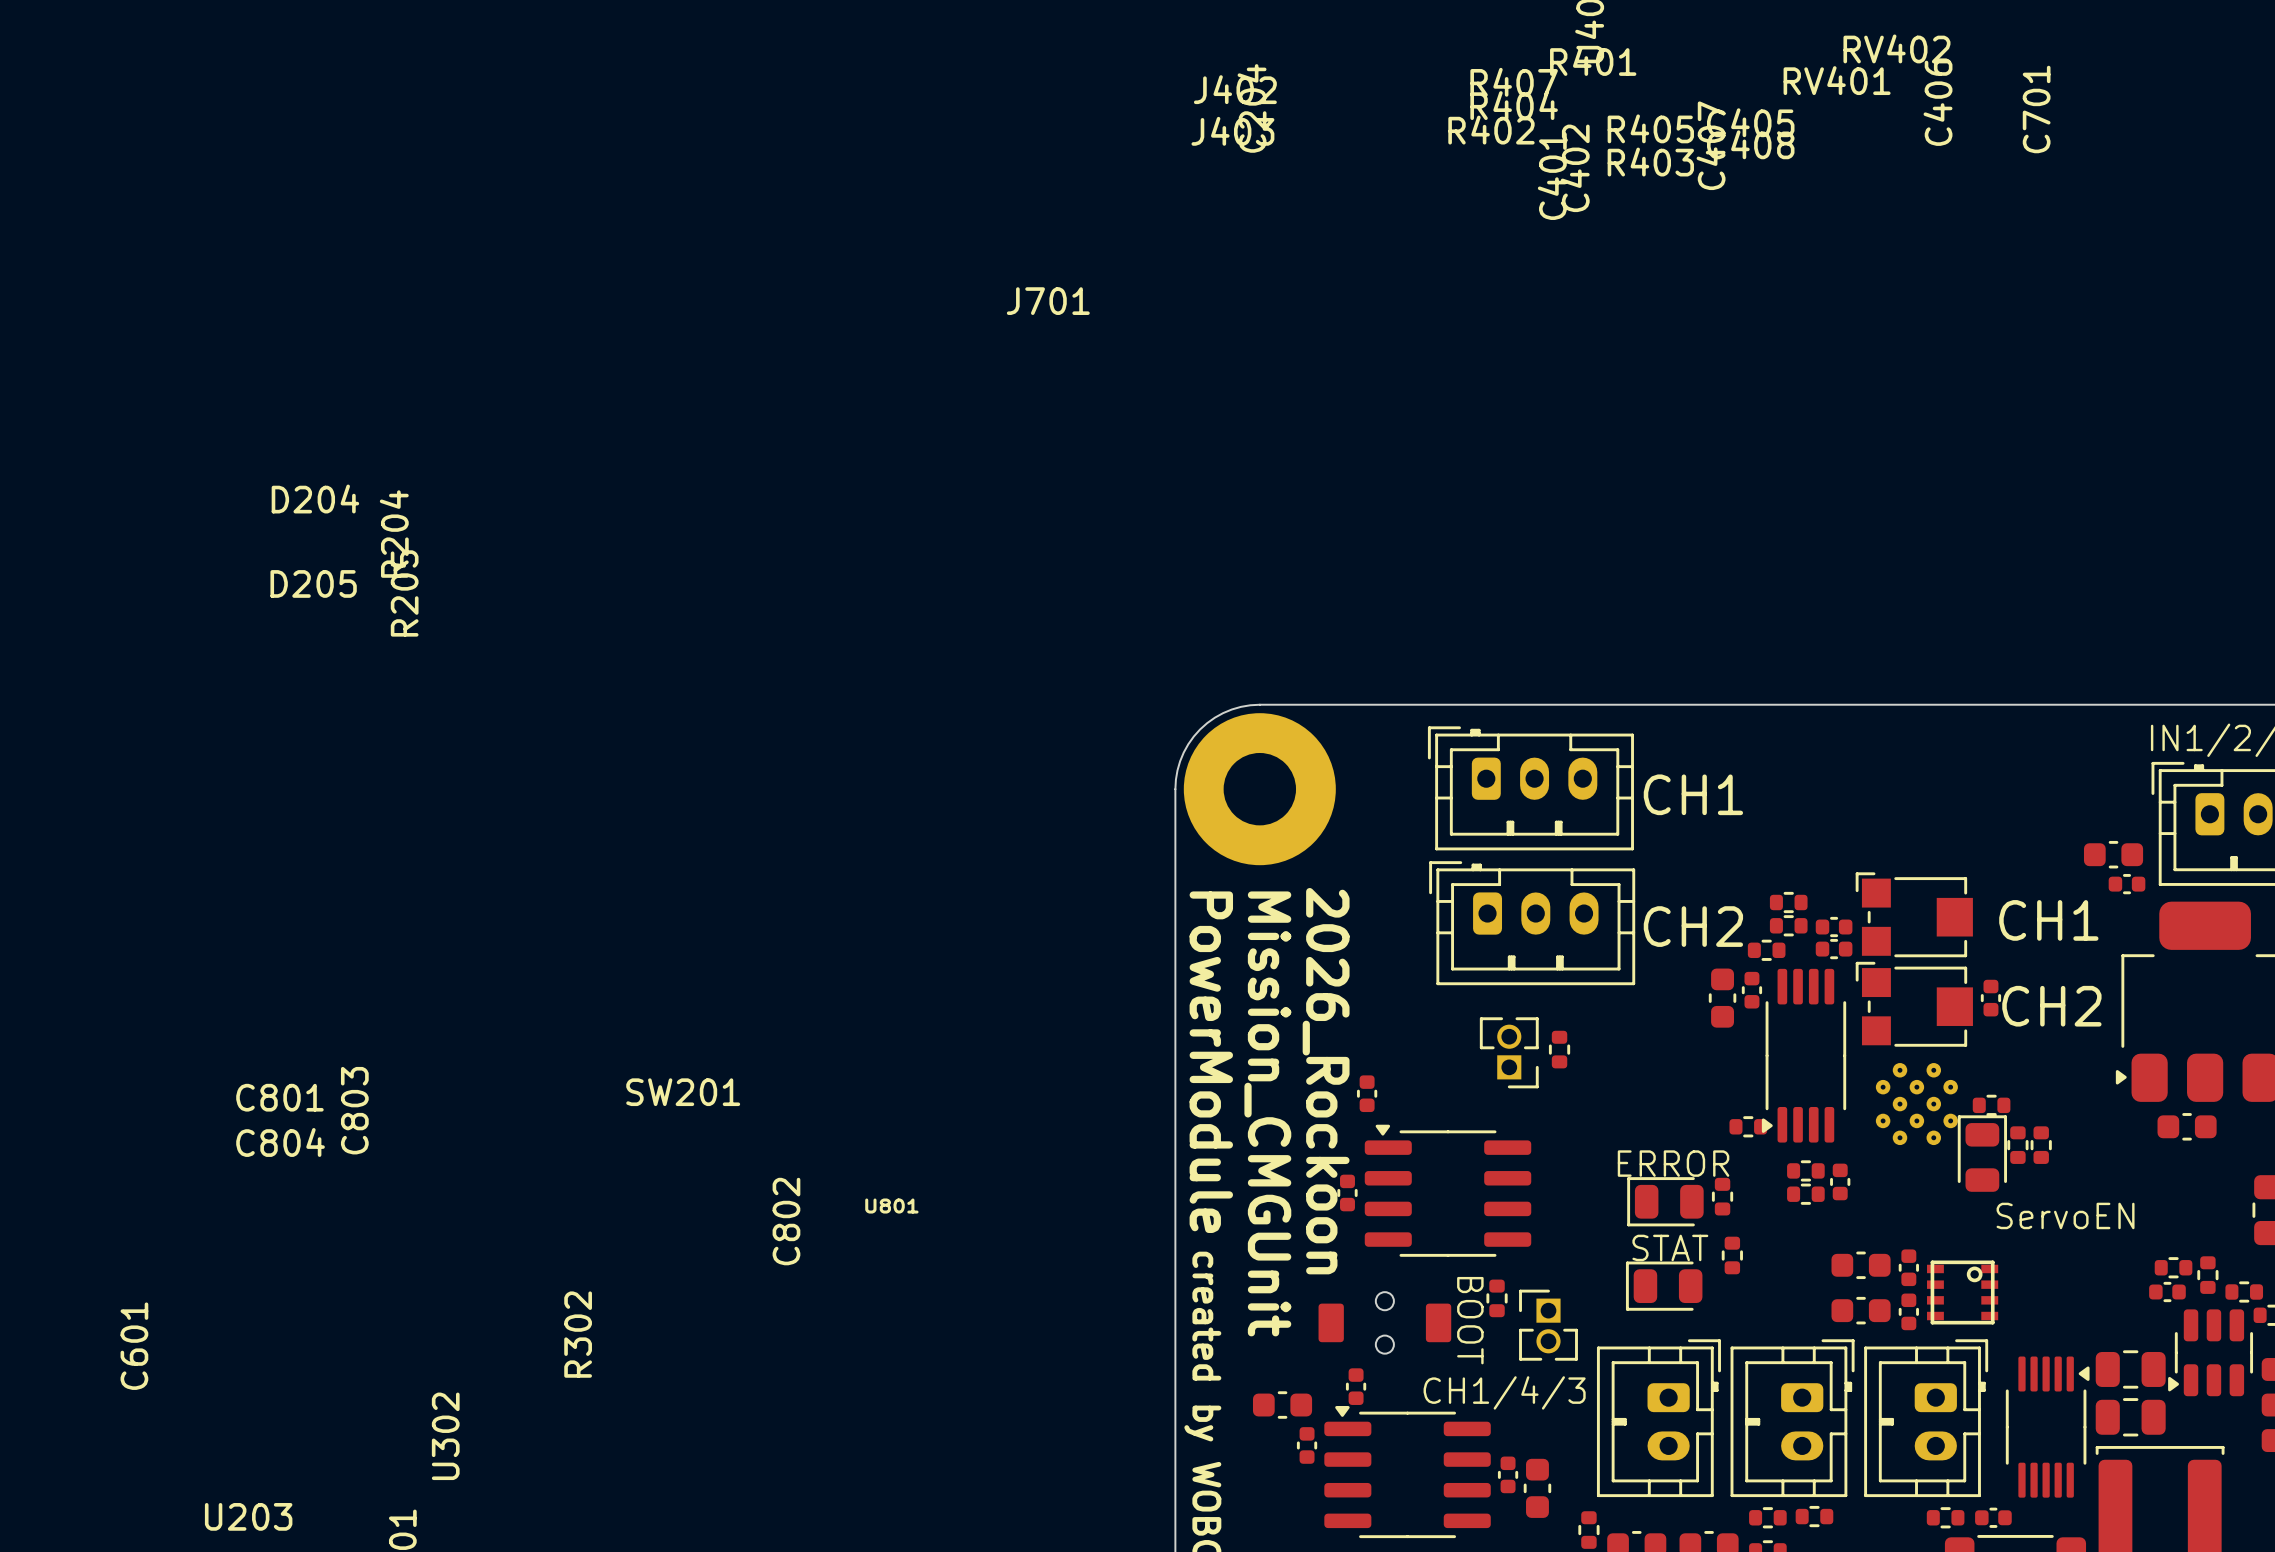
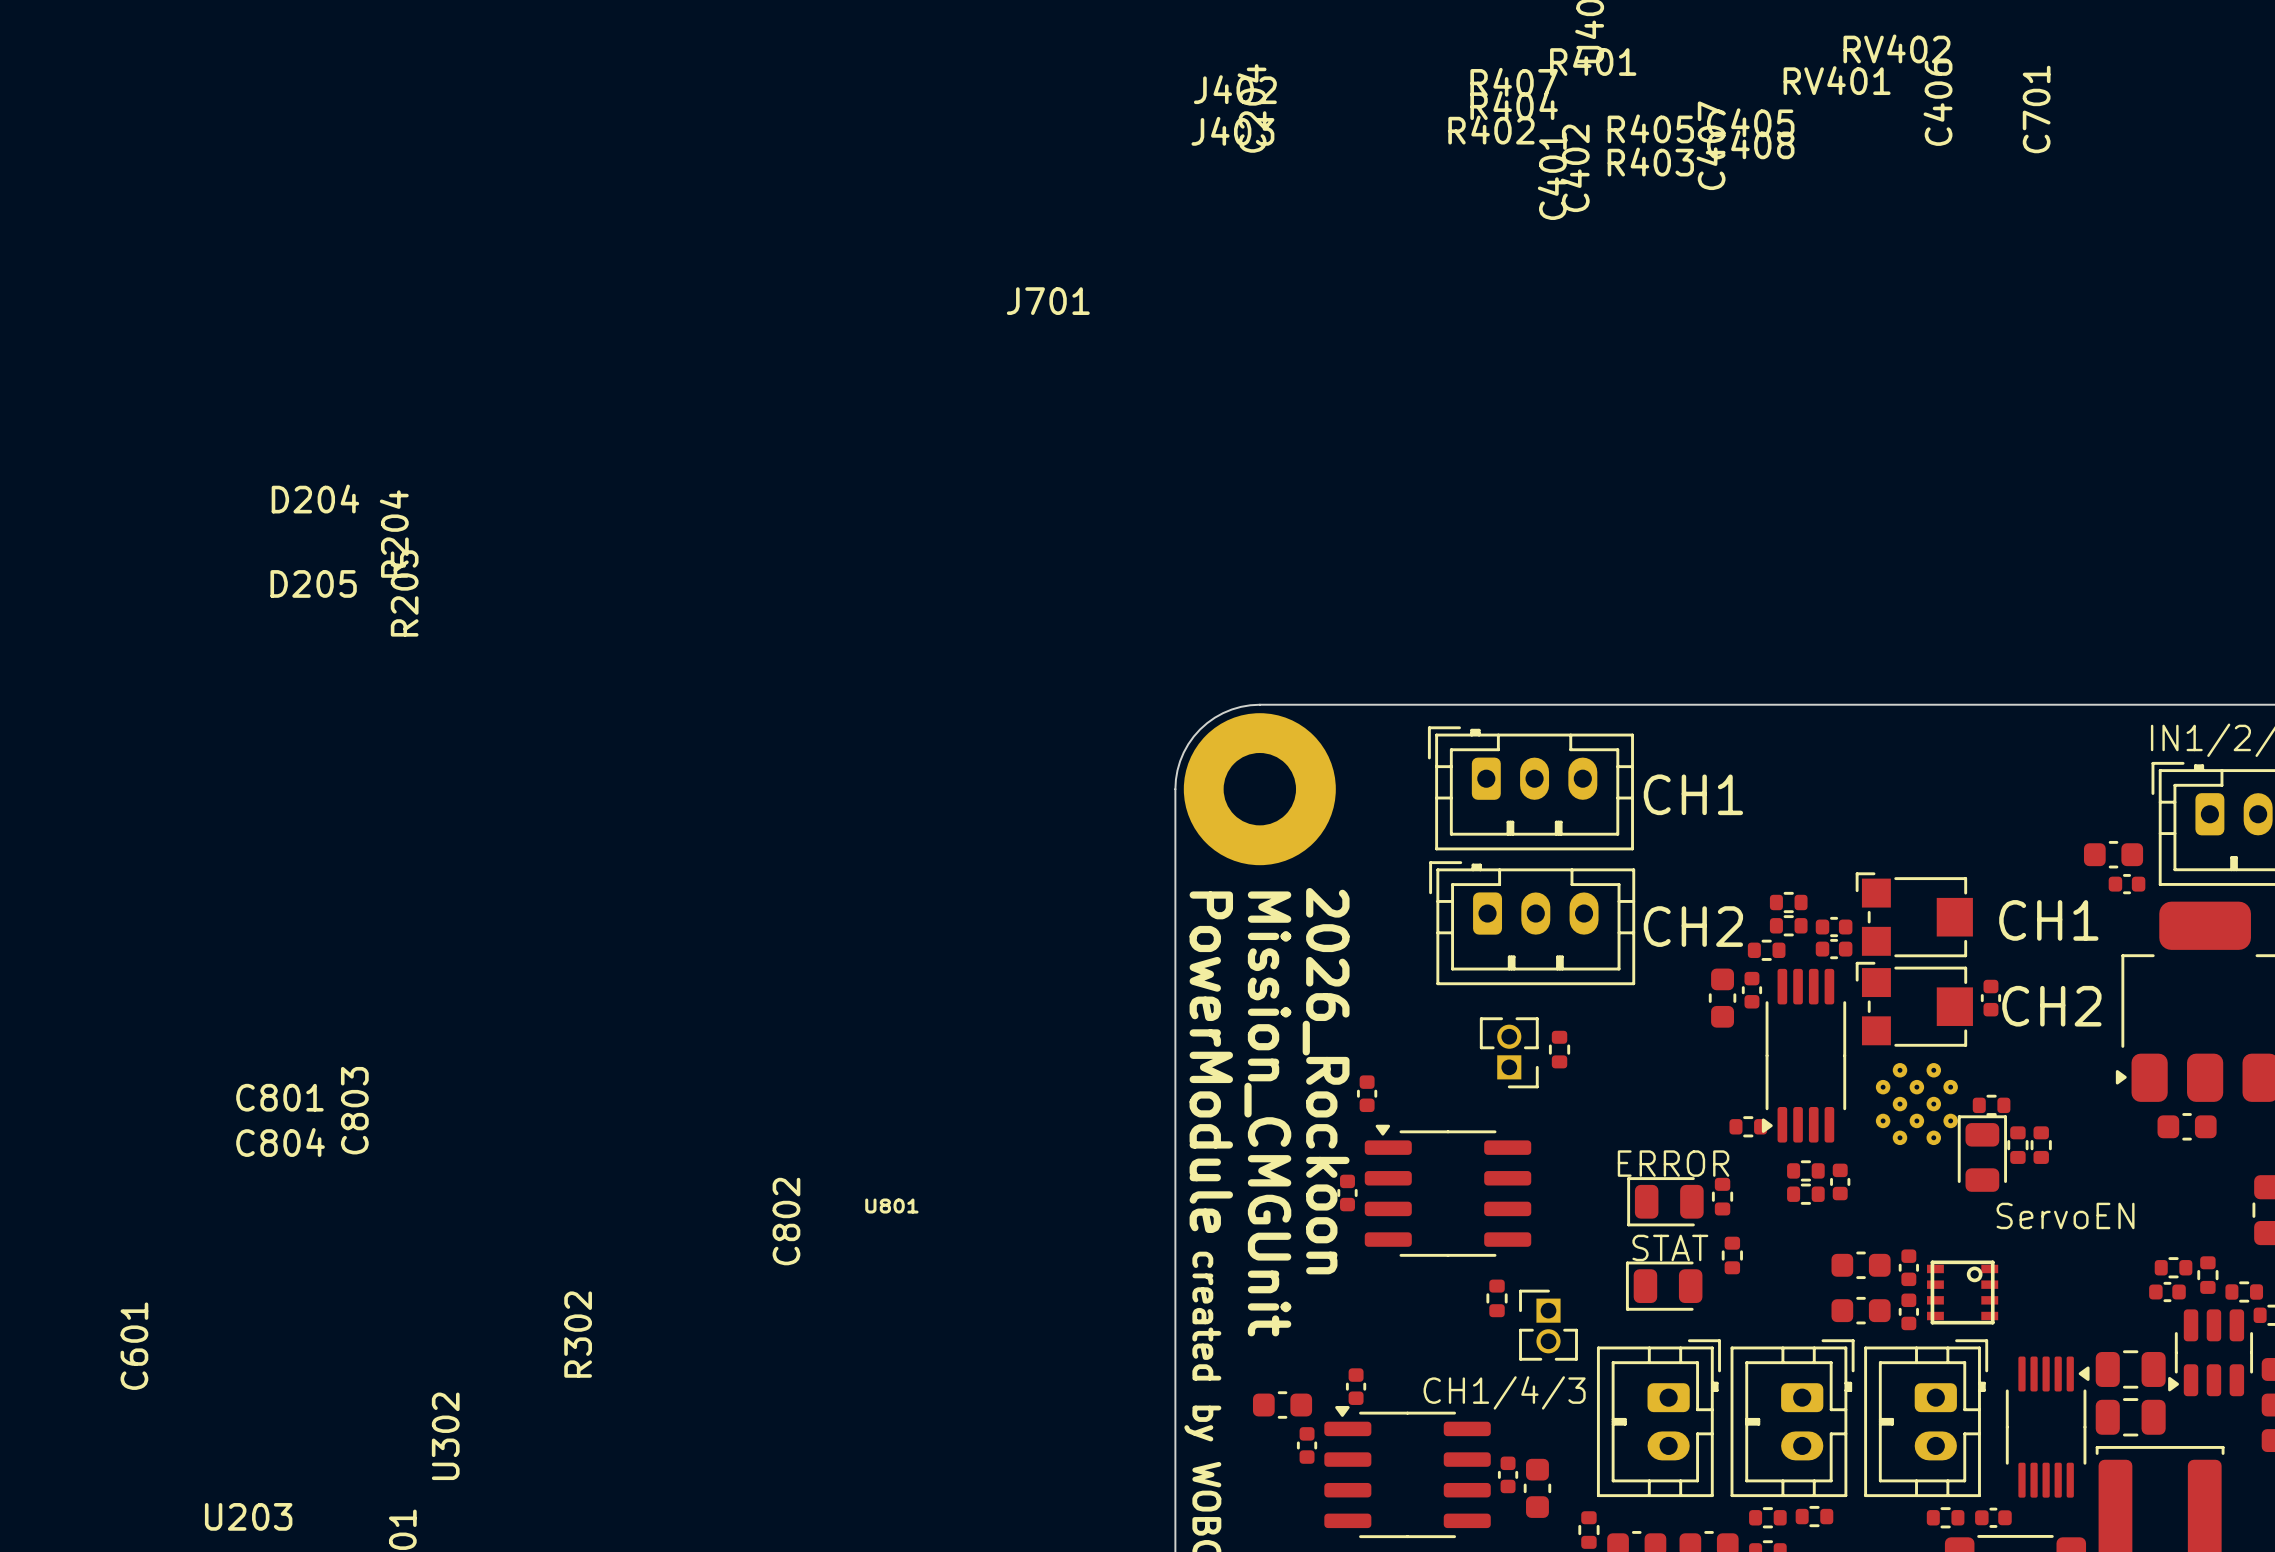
text: BOOT (1470, 1320) -> none
SW201: (1384, 1322) -> none

